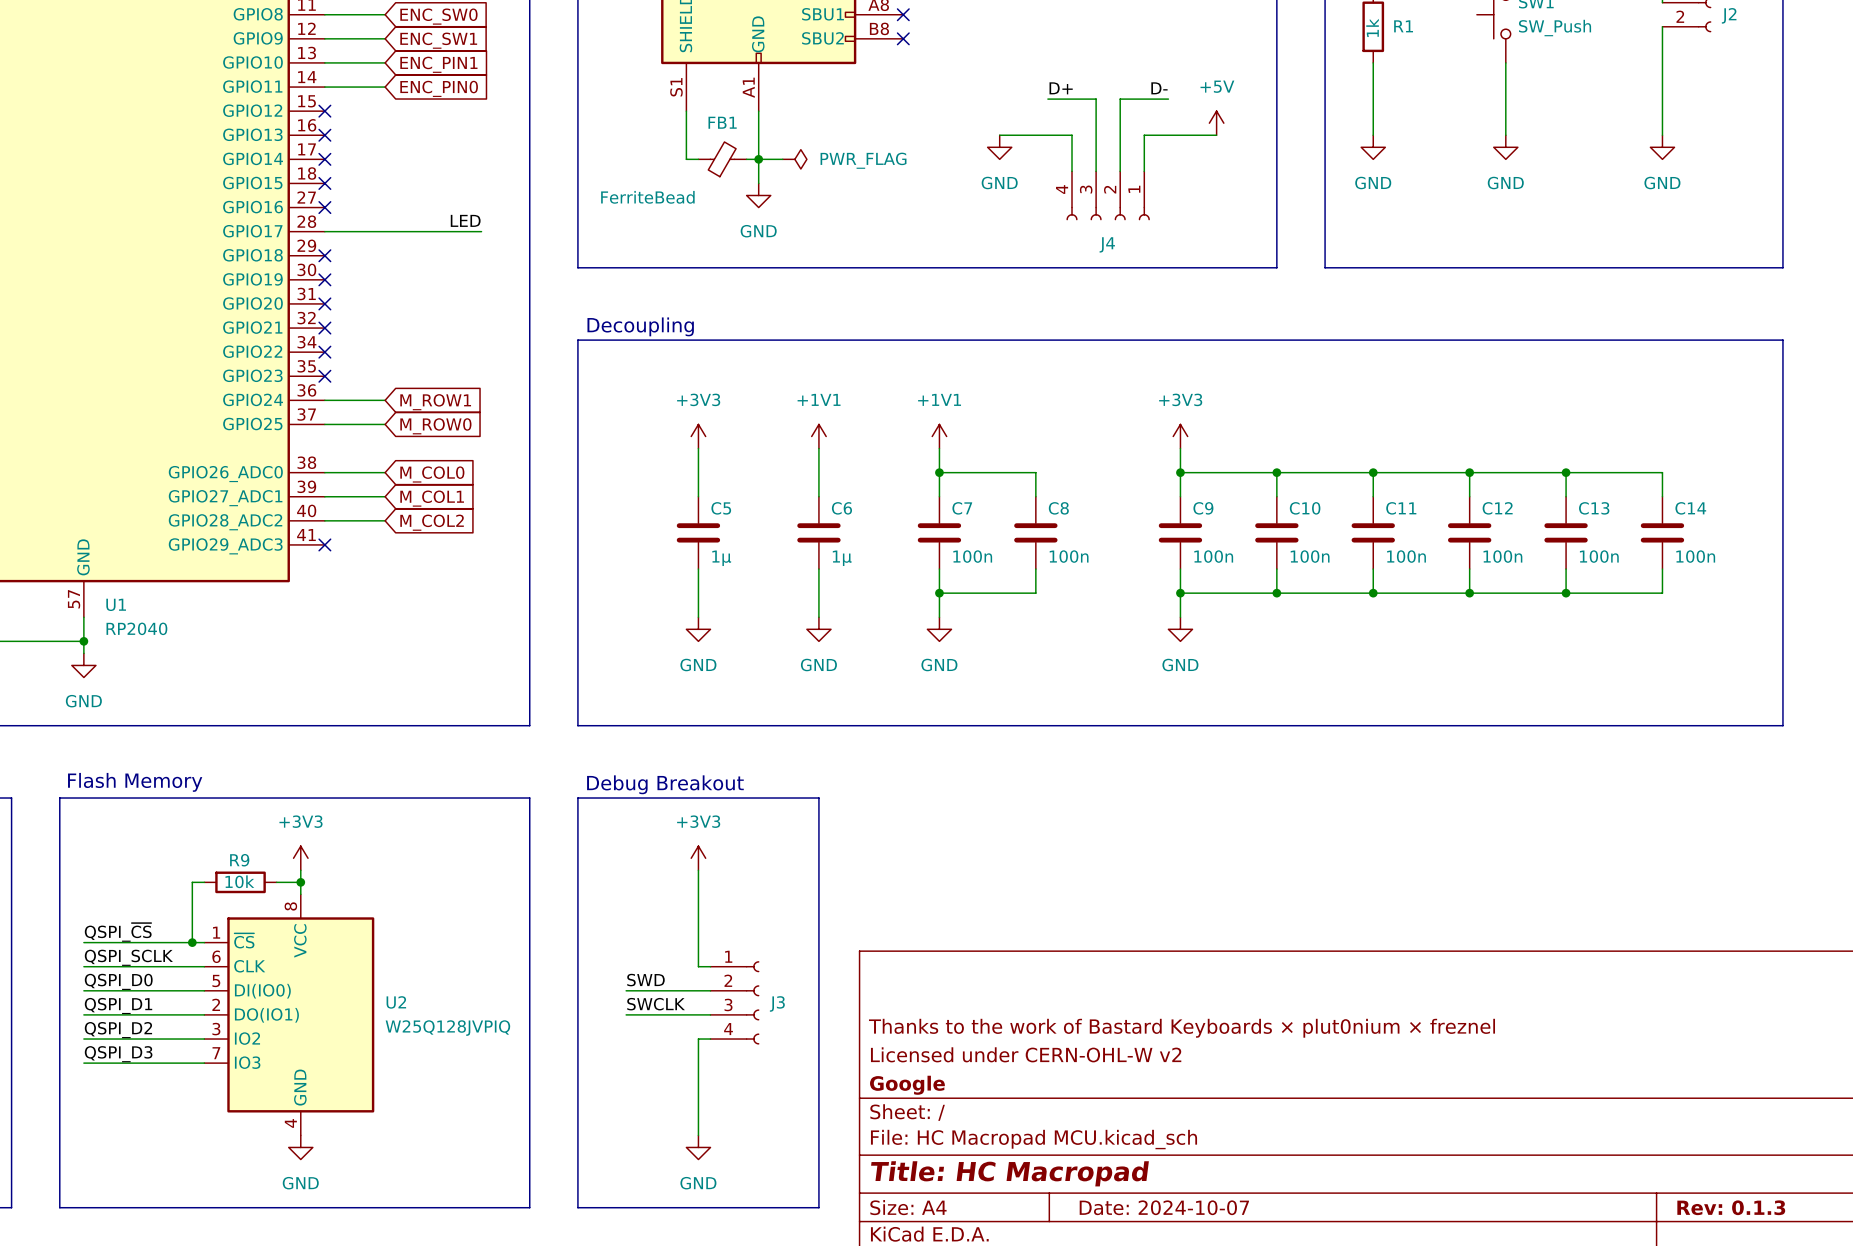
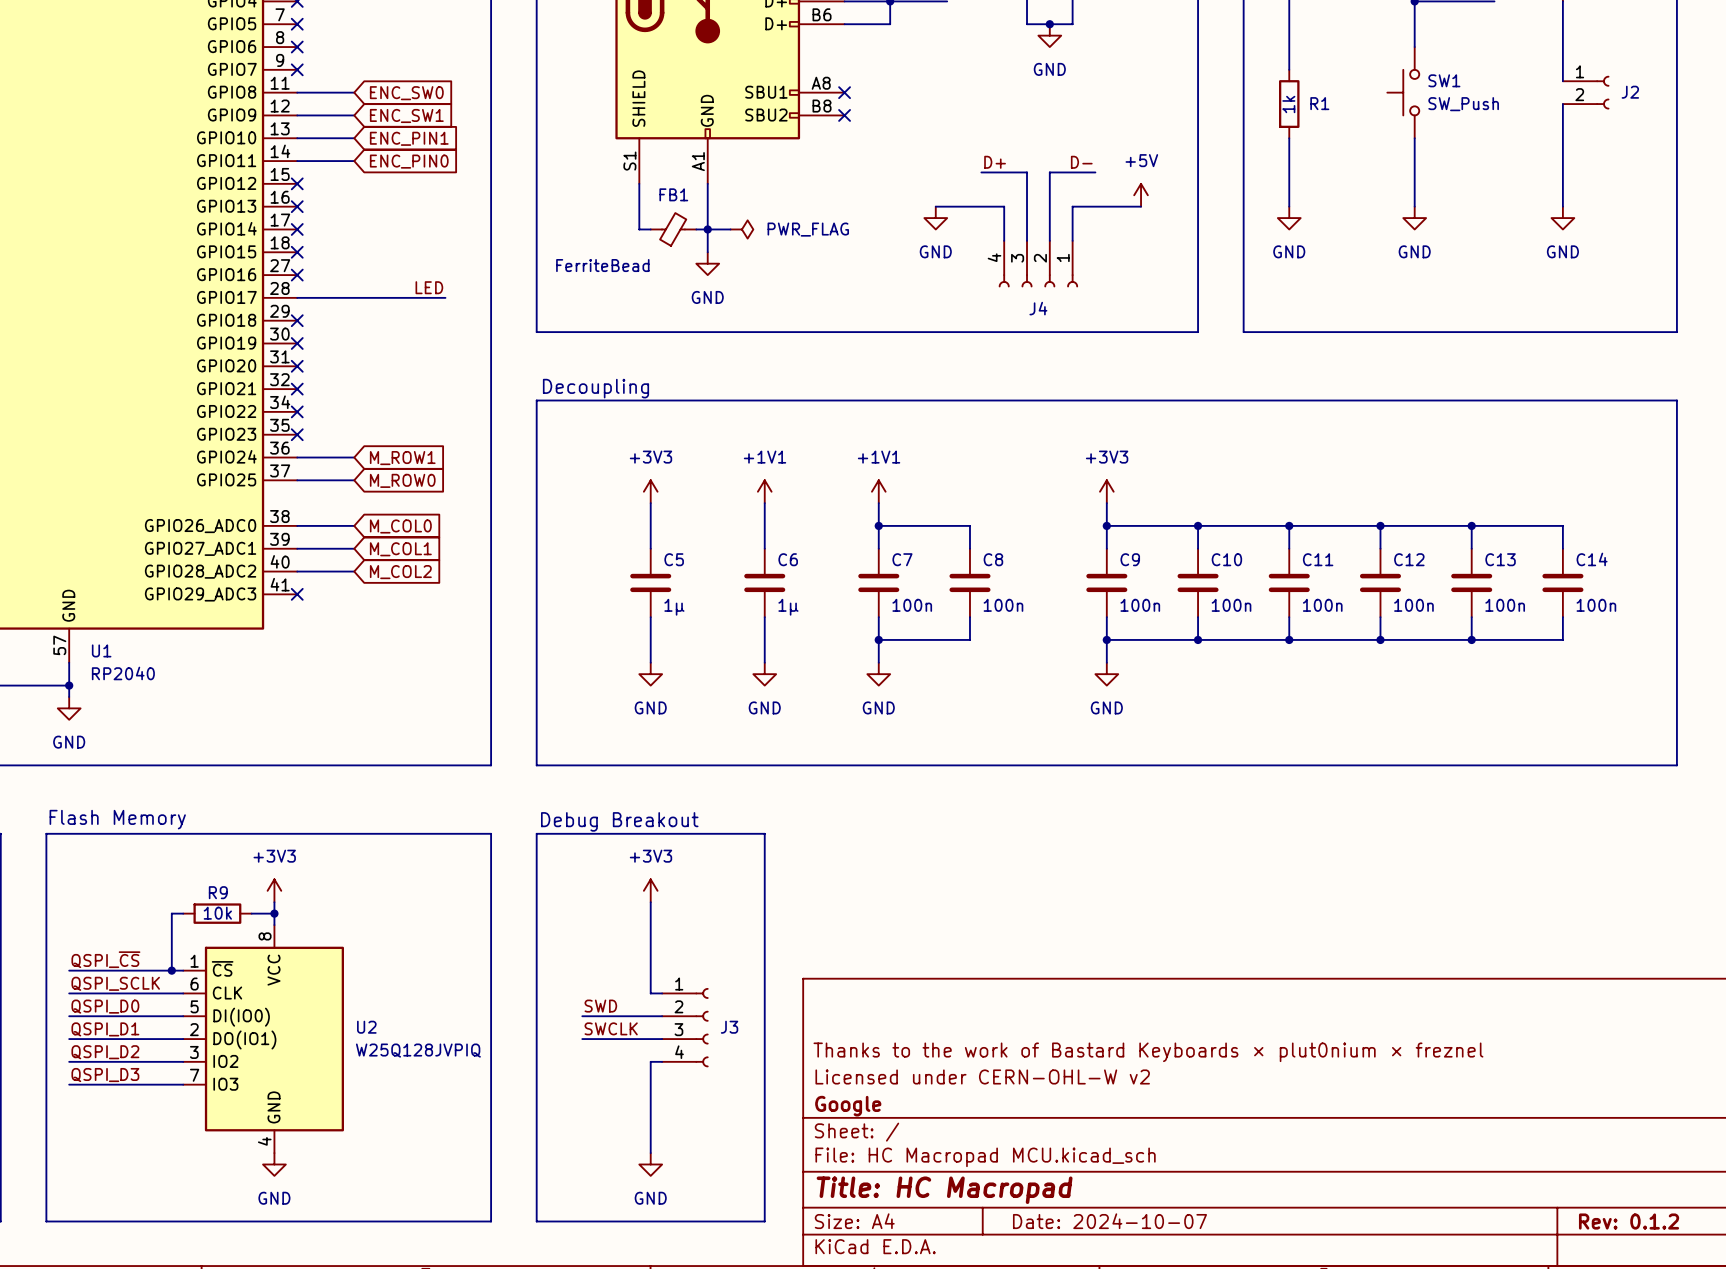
title block: Rev: 0.1.3 (1731, 1207) -> Rev: 0.1.2 (1629, 1221)

